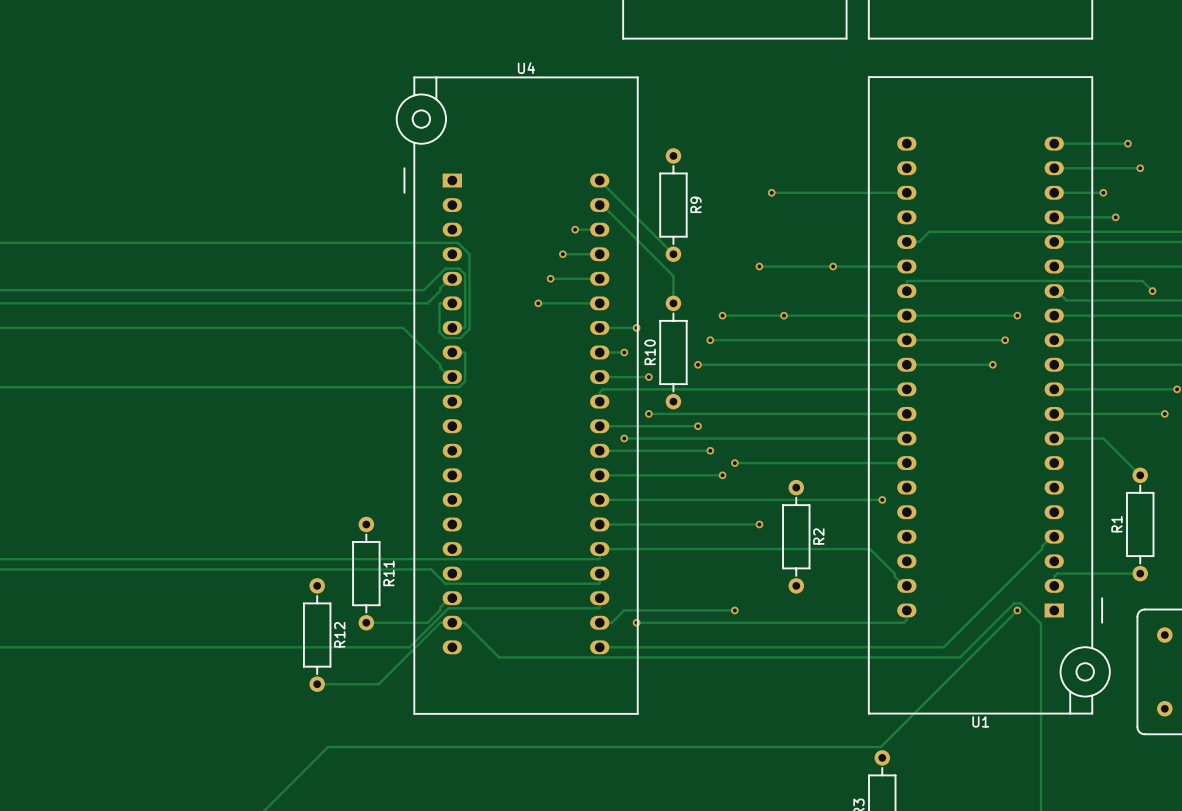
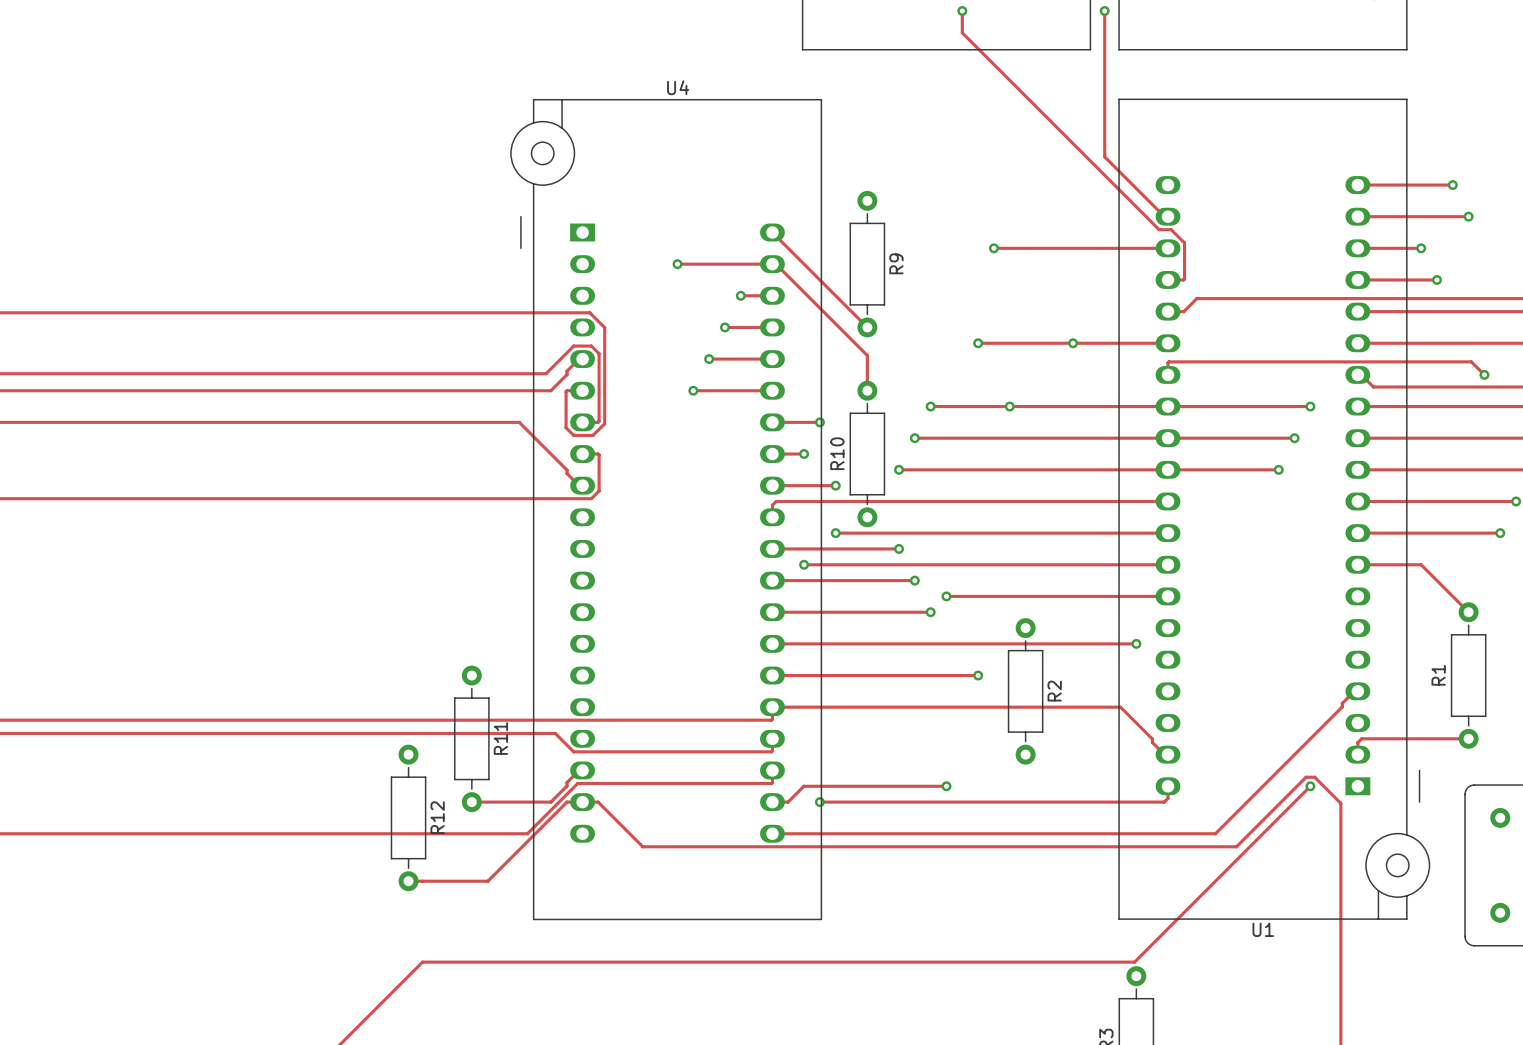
track: none -> (962, 11) (962, 32) (1159, 229) (1171, 229) (1184, 242) (1184, 279) (1168, 279)
via: none -> (962, 11)
track: none -> (1104, 11) (1104, 156) (1164, 216) (1168, 216)
via: none -> (1104, 11)
track: none -> (677, 264) (772, 264)
via: none -> (677, 264)

